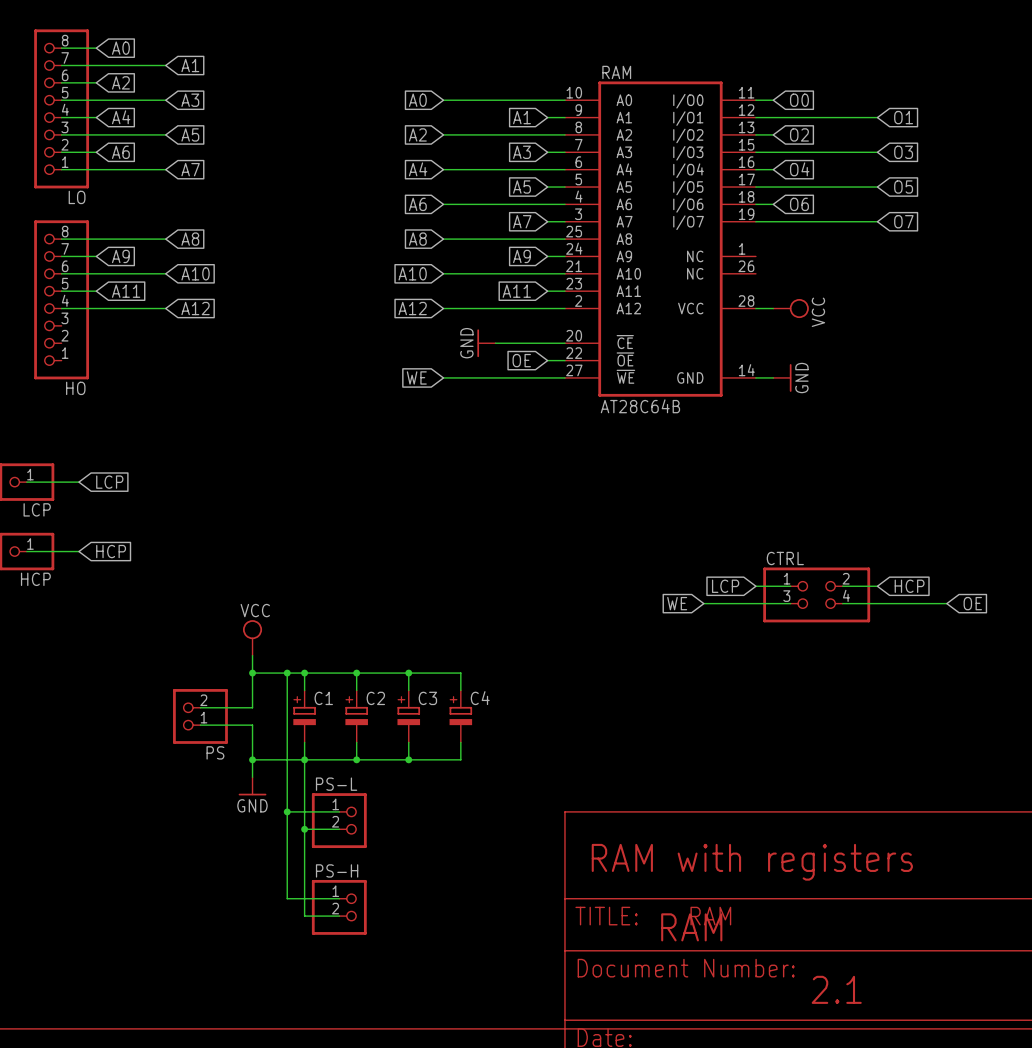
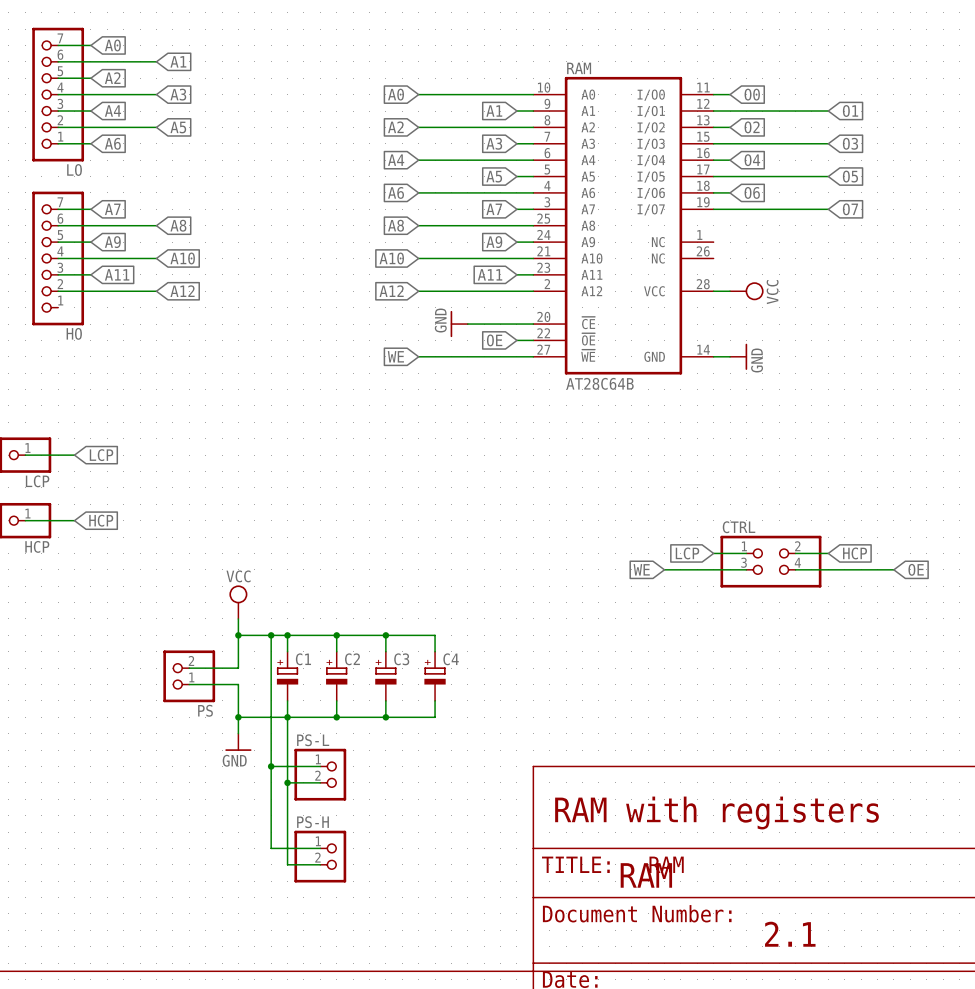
LO: none -> (58, 94)
LO: (61, 108) -> none
wire: (61, 169) (165, 169) -> none
global label position: A7 (190, 169) -> A7 (112, 209)
HO: none -> (58, 258)
HO: (61, 299) -> none

